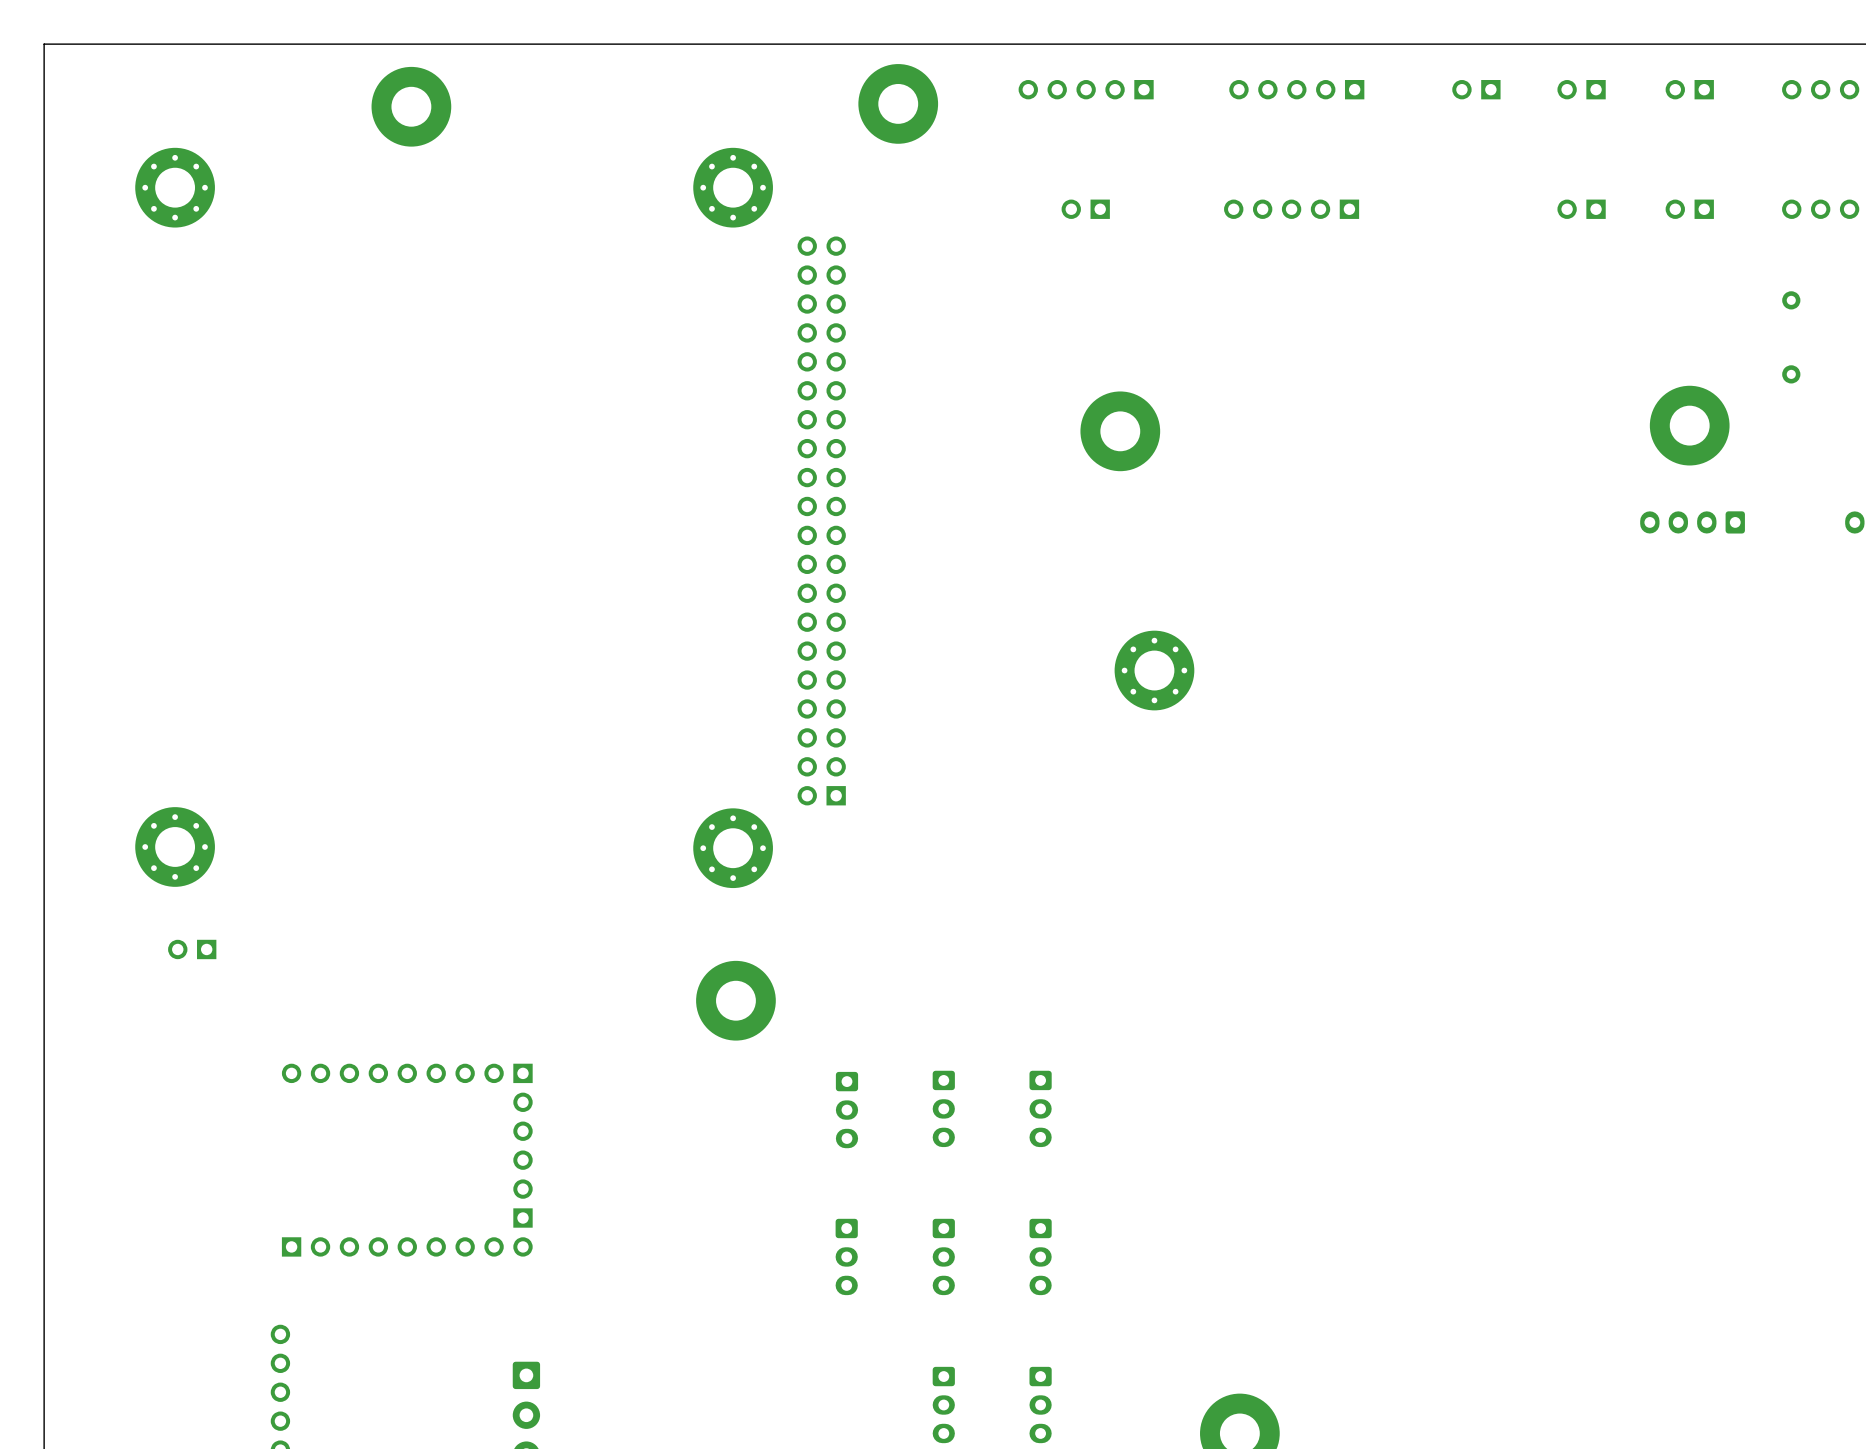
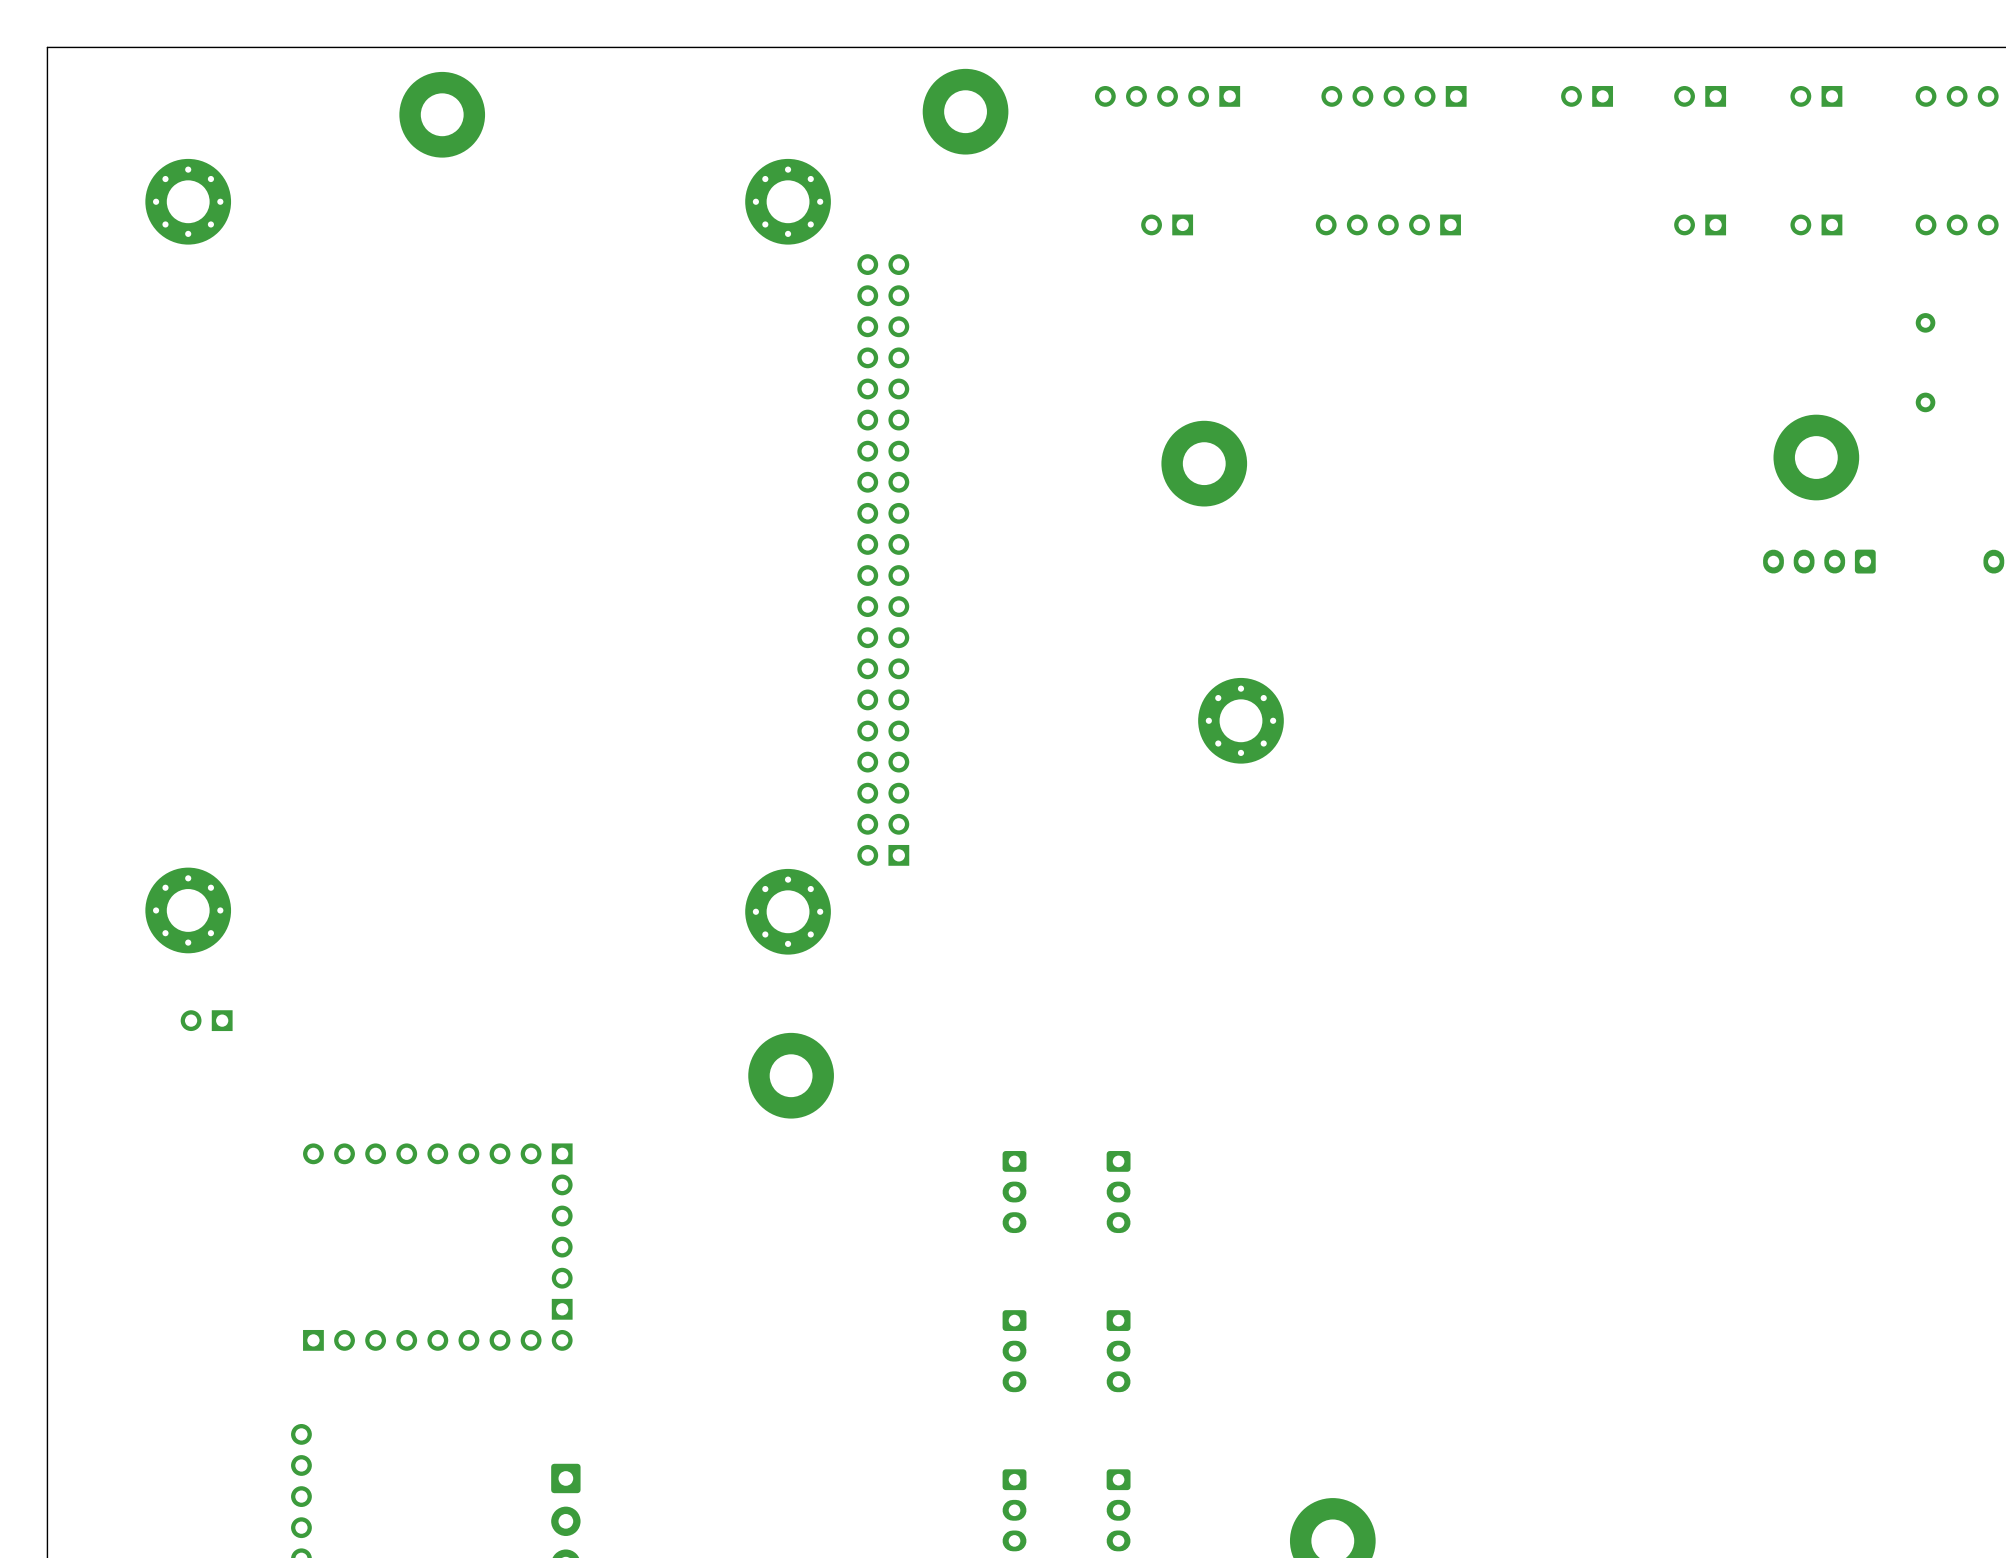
part: (846, 1110) -> none
part: (846, 1256) -> none

